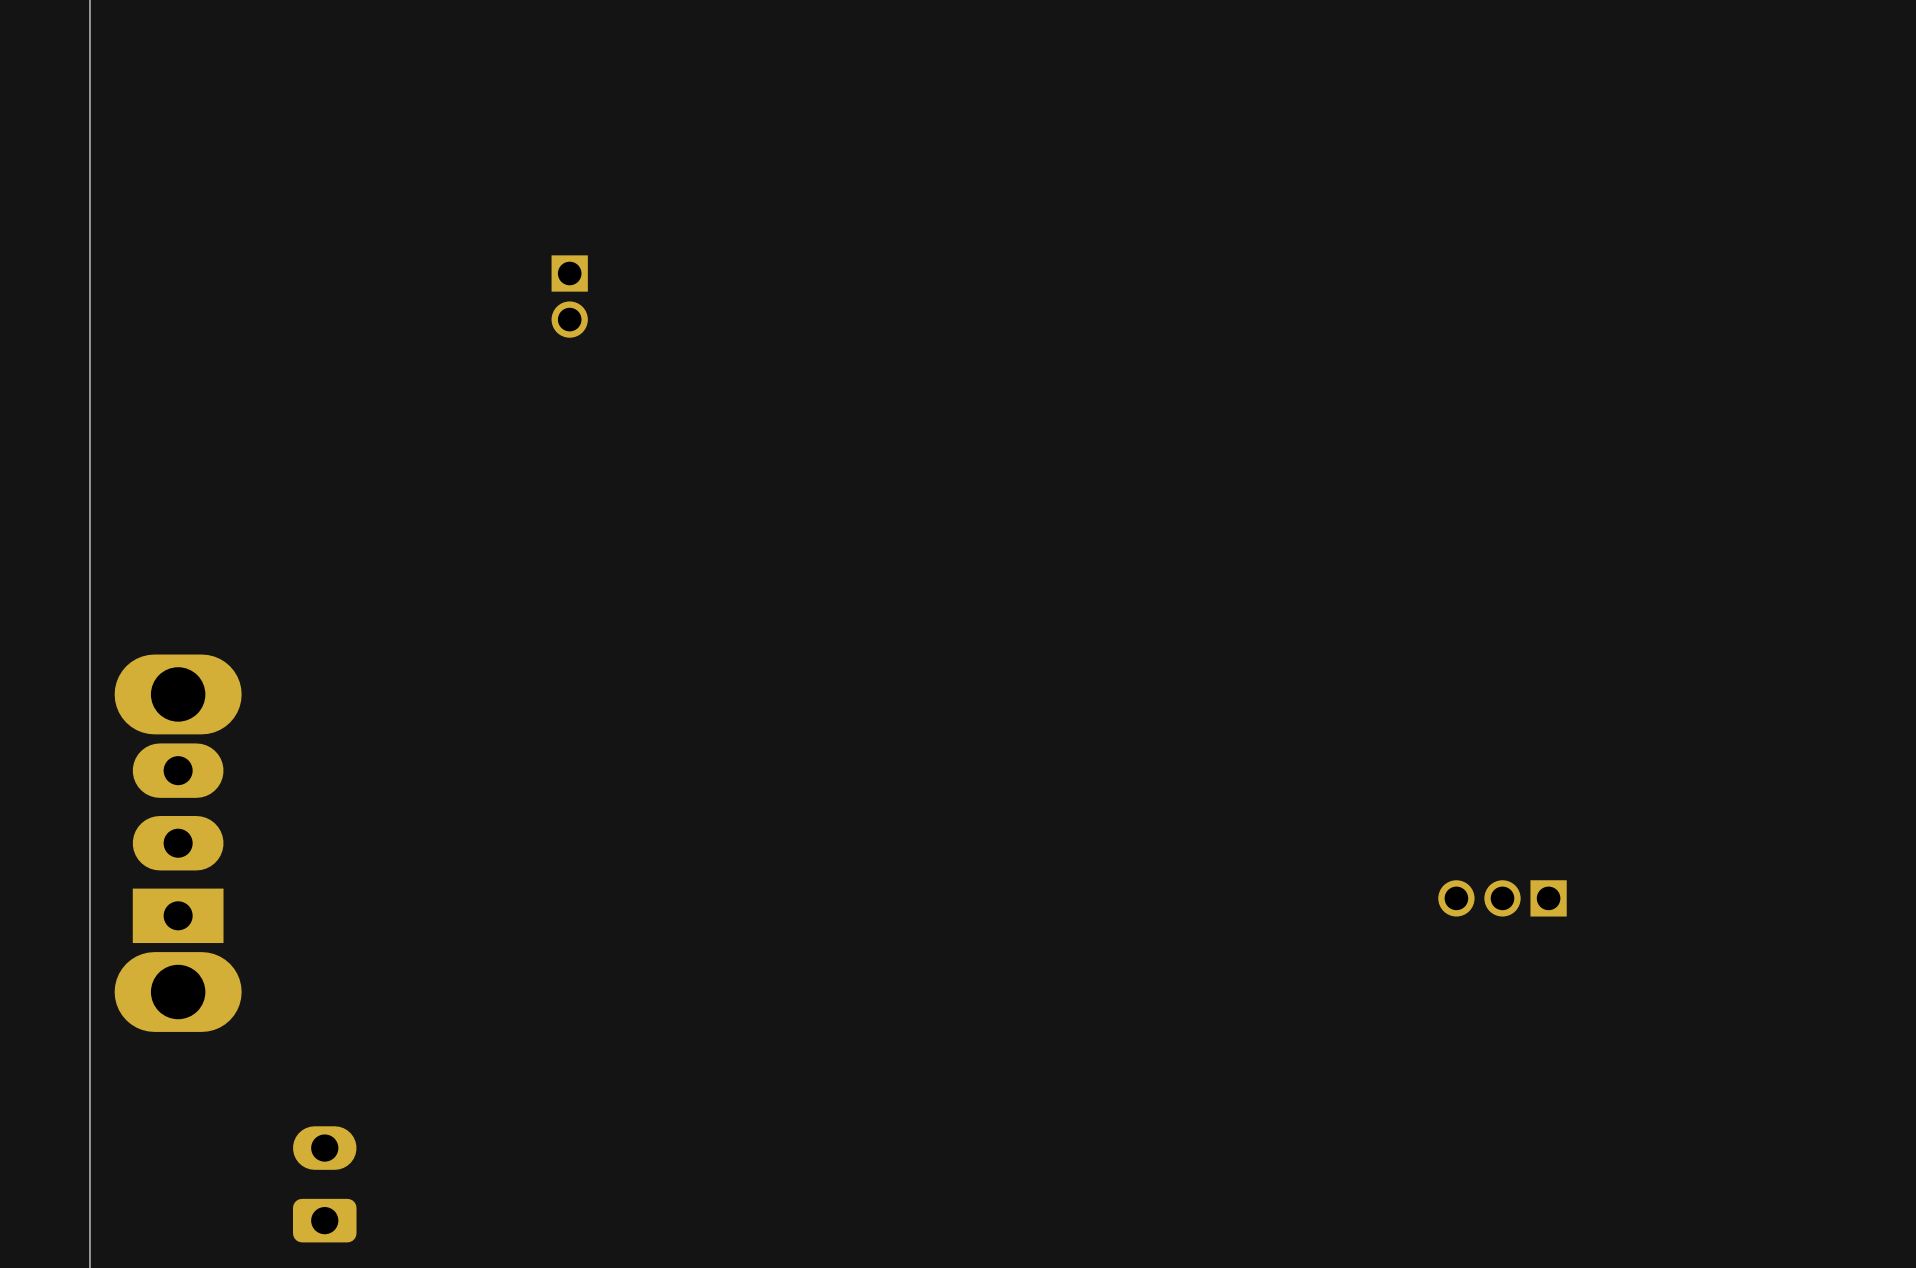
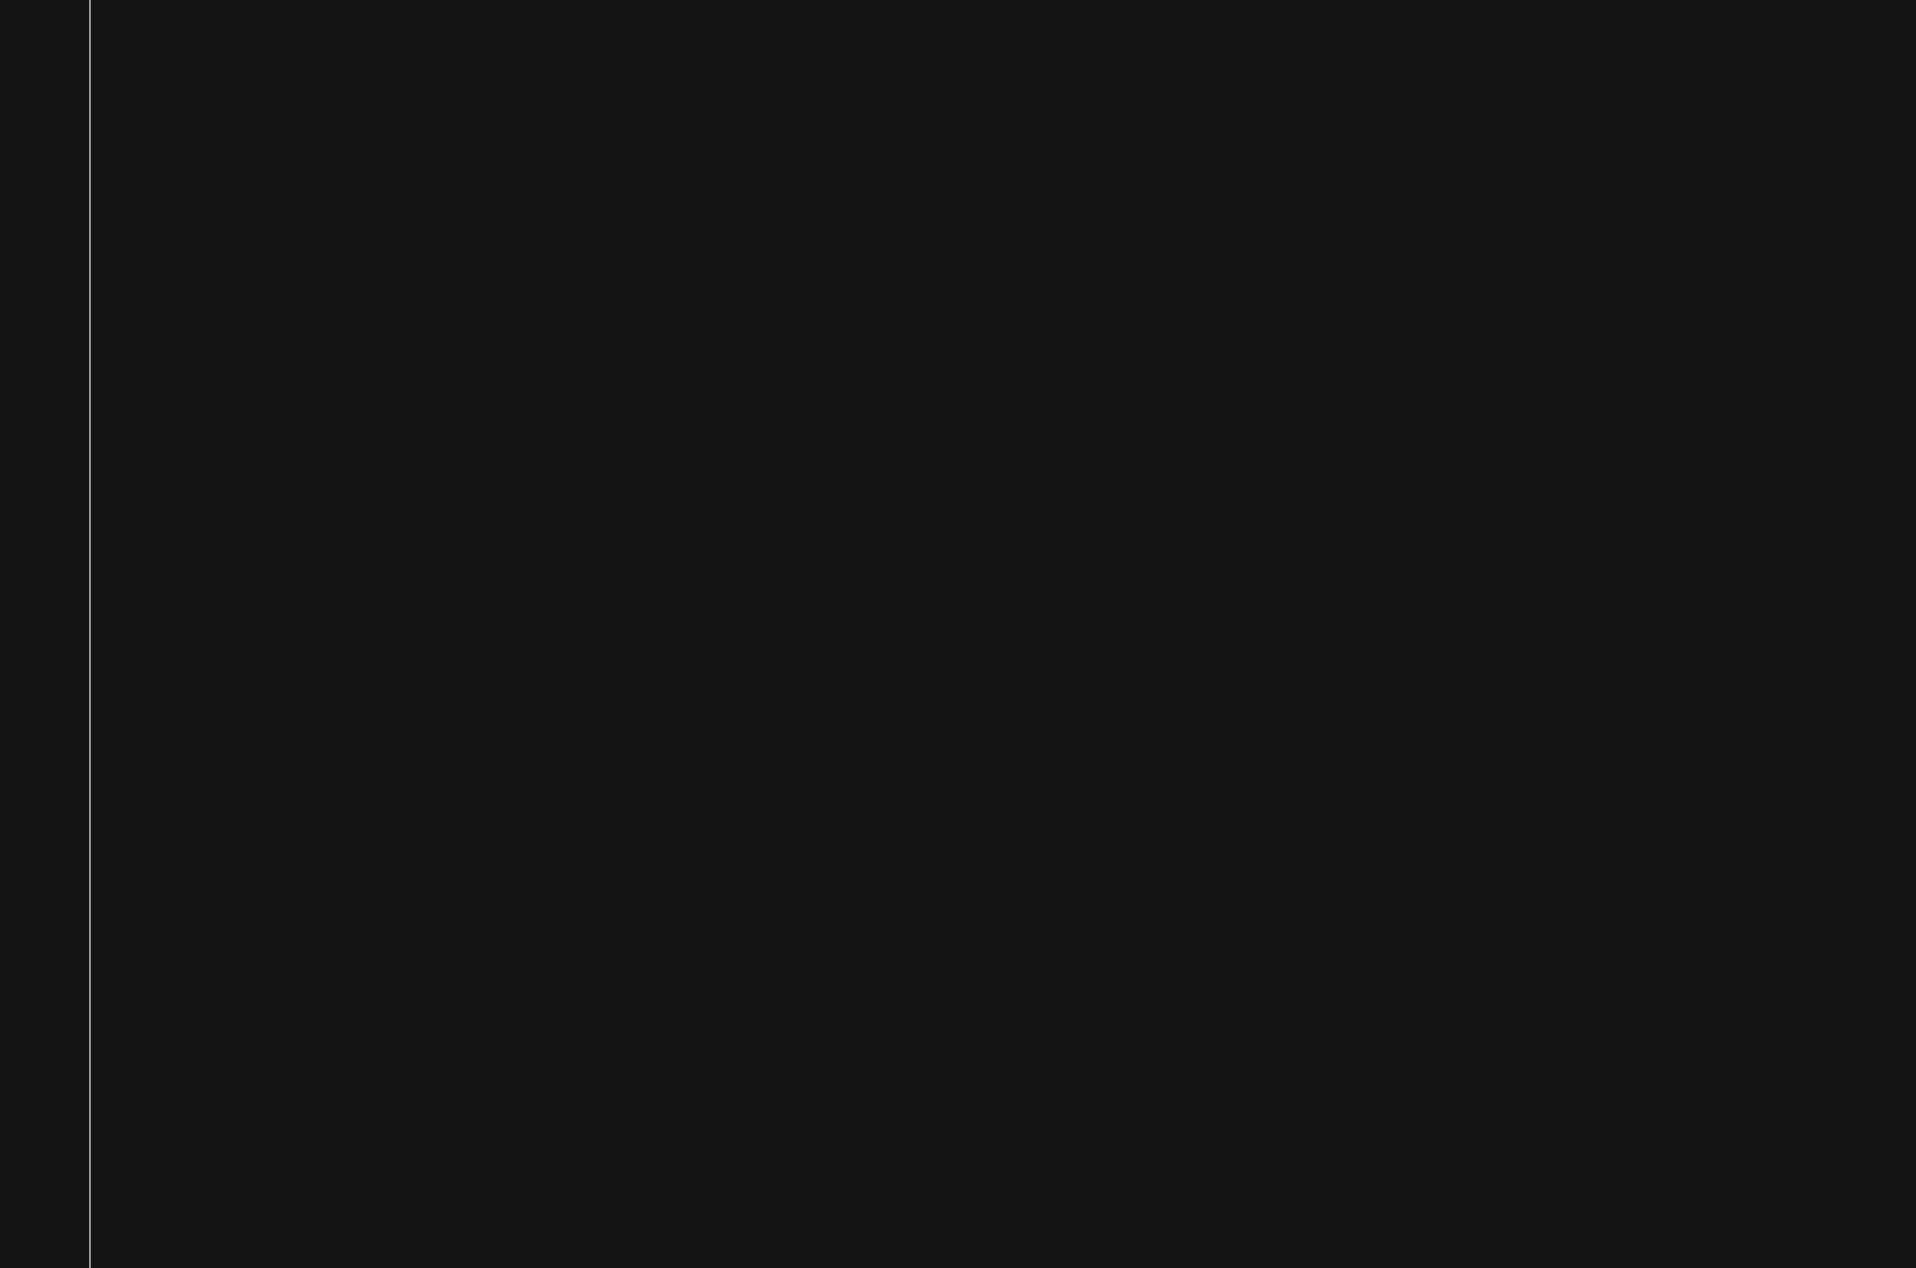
part: (569, 296) -> none
part: (178, 843) -> none
part: (1502, 898) -> none
part: (324, 1184) -> none

